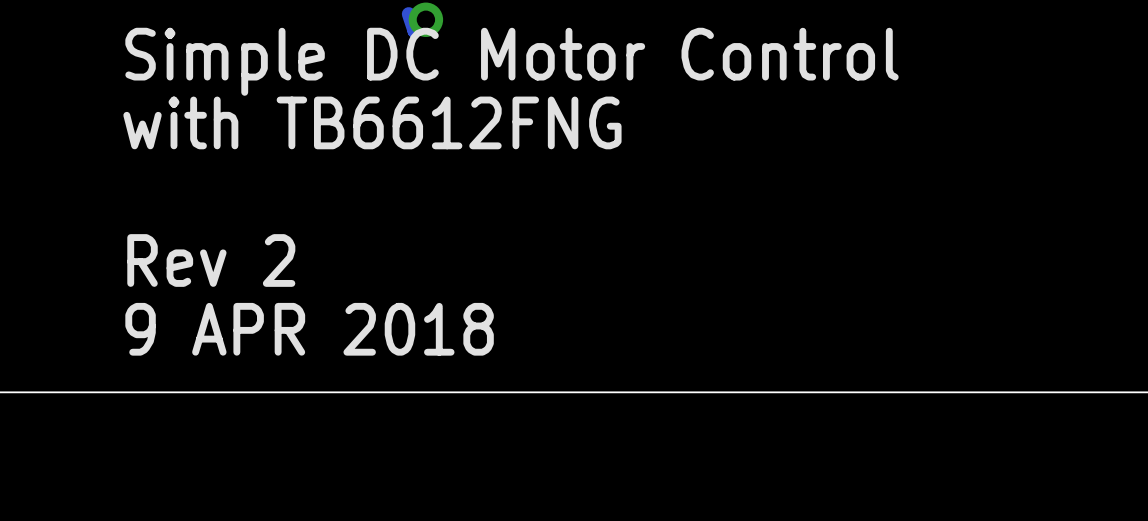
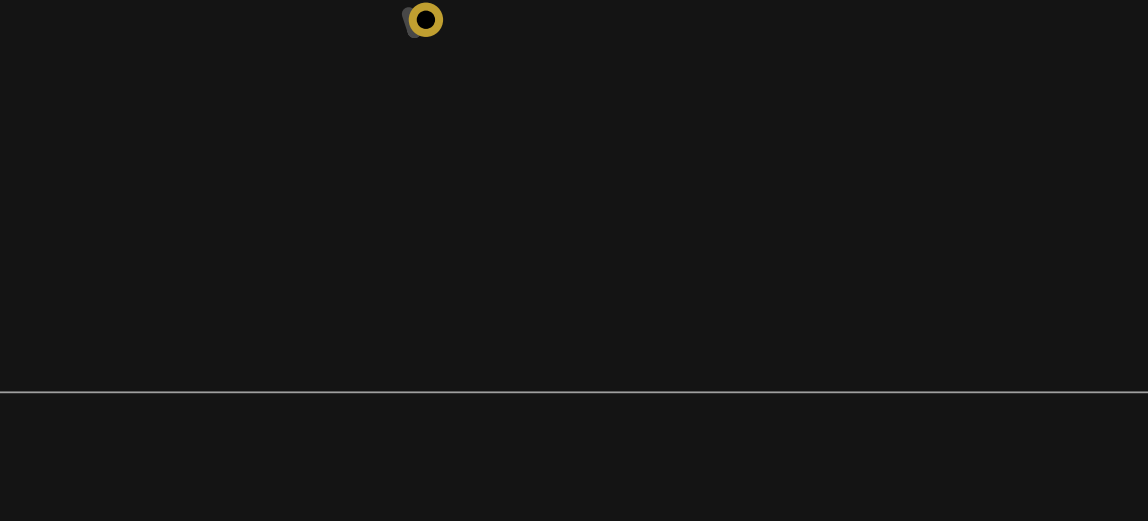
text: Simple DC Motor Control (511, 61) -> none
text: with TB6612FNG (372, 122) -> none
text: Rev 2 (211, 260) -> none
text: 9 APR 2018 (309, 329) -> none

